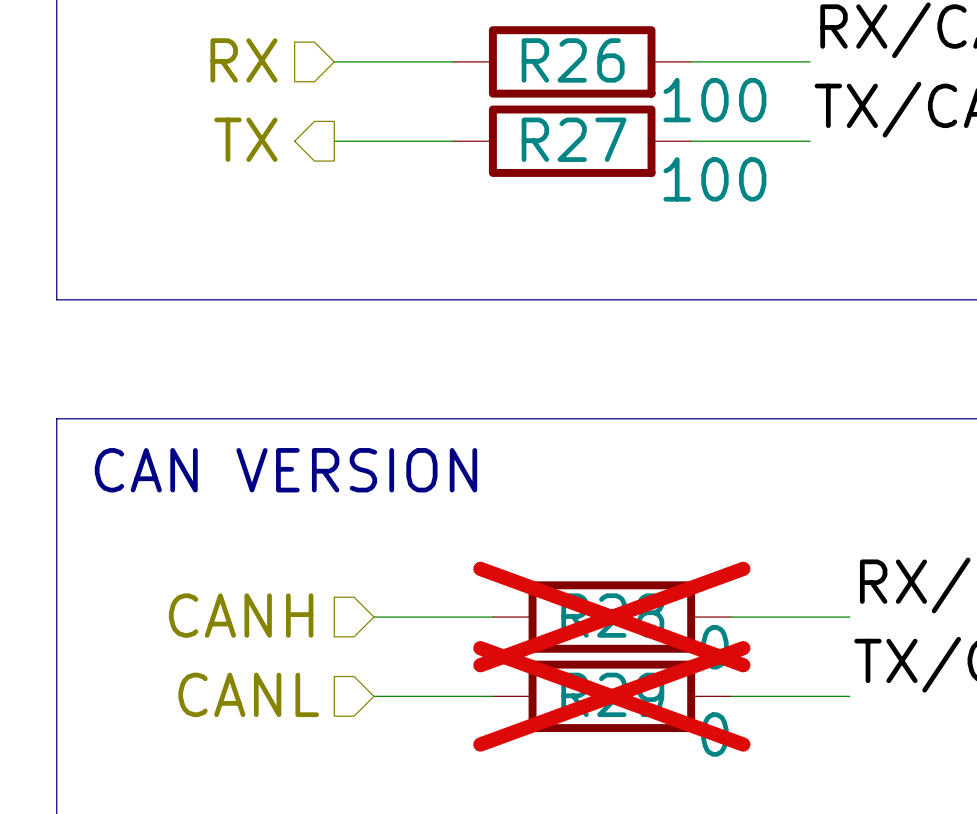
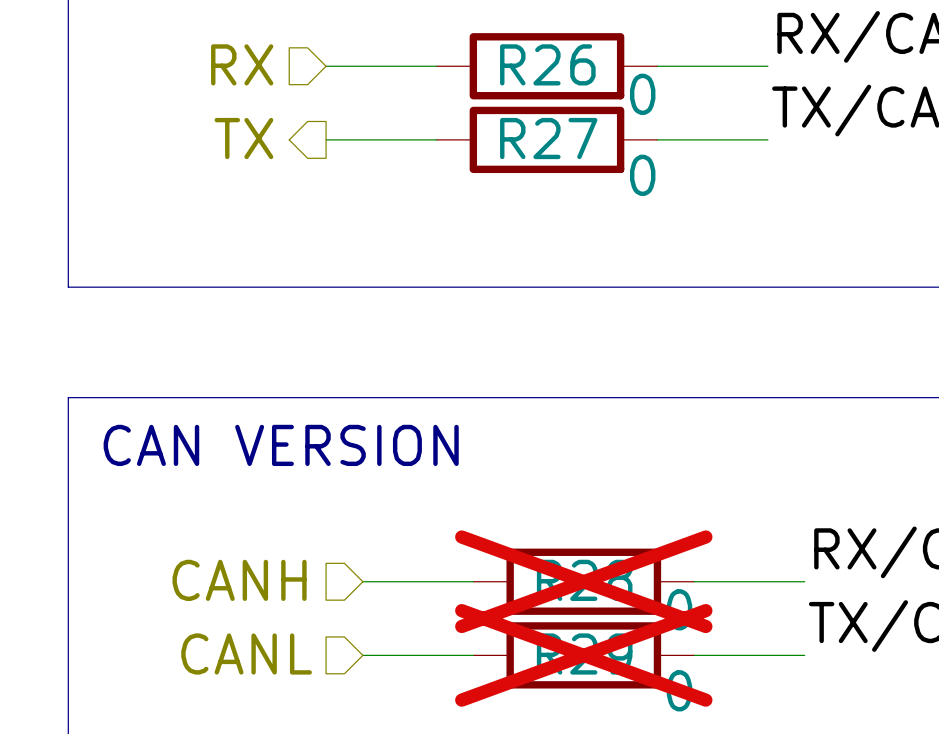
R26 value: 100 (714, 100) -> 0 (642, 94)
R27 value: 100 (714, 179) -> 0 (642, 175)

